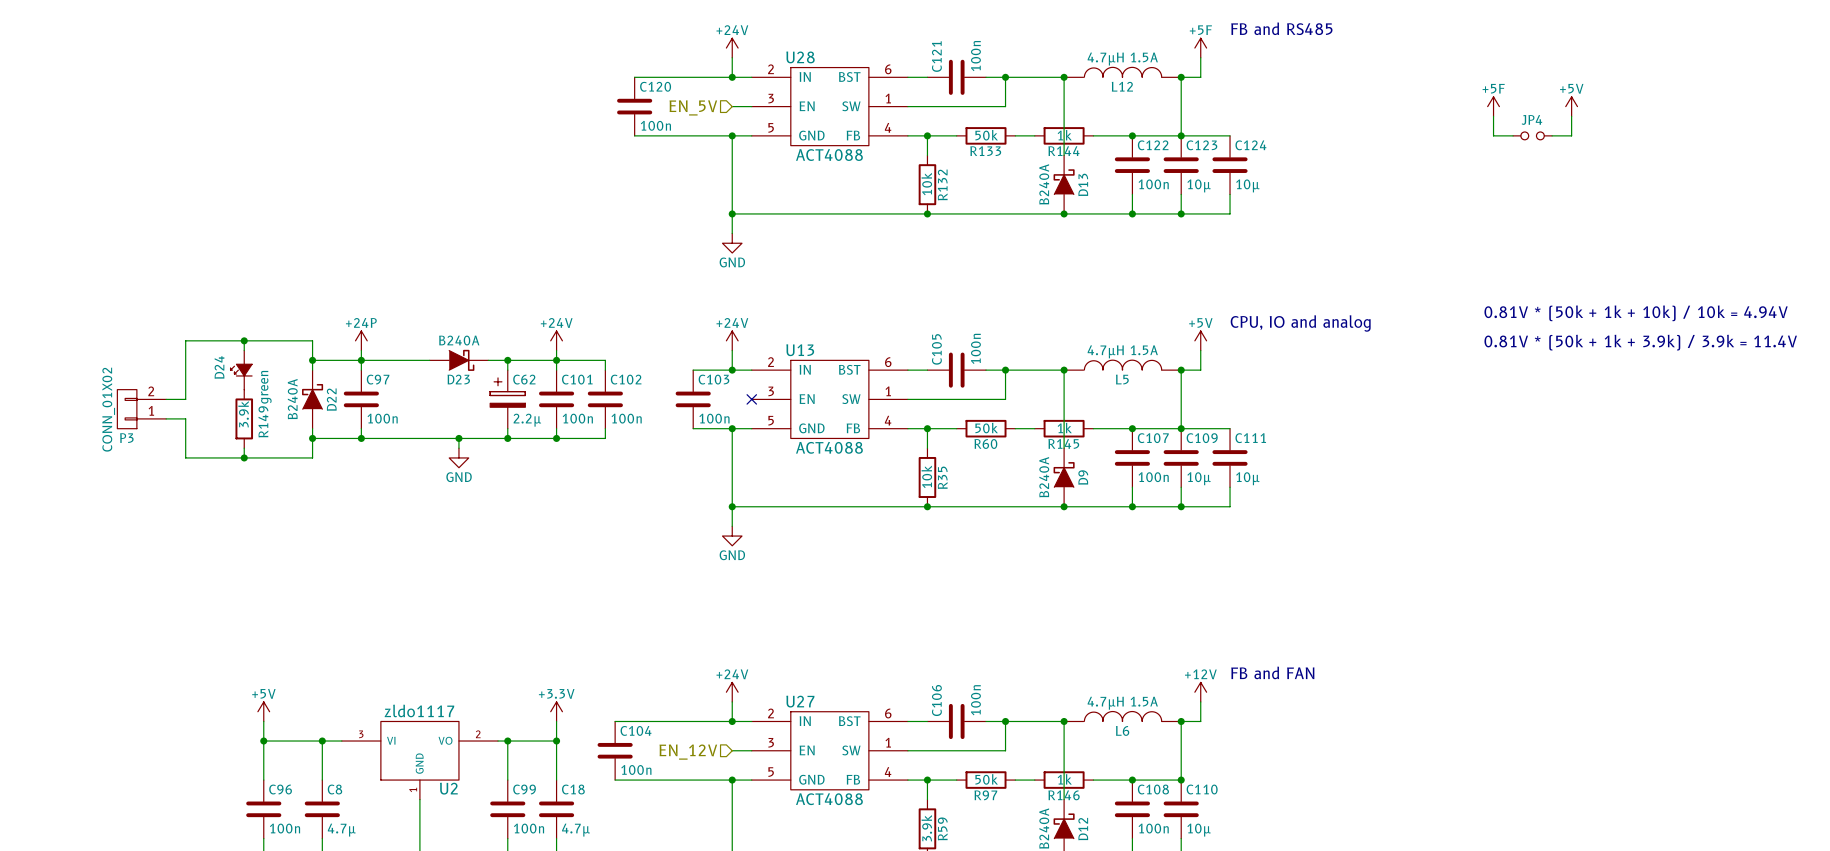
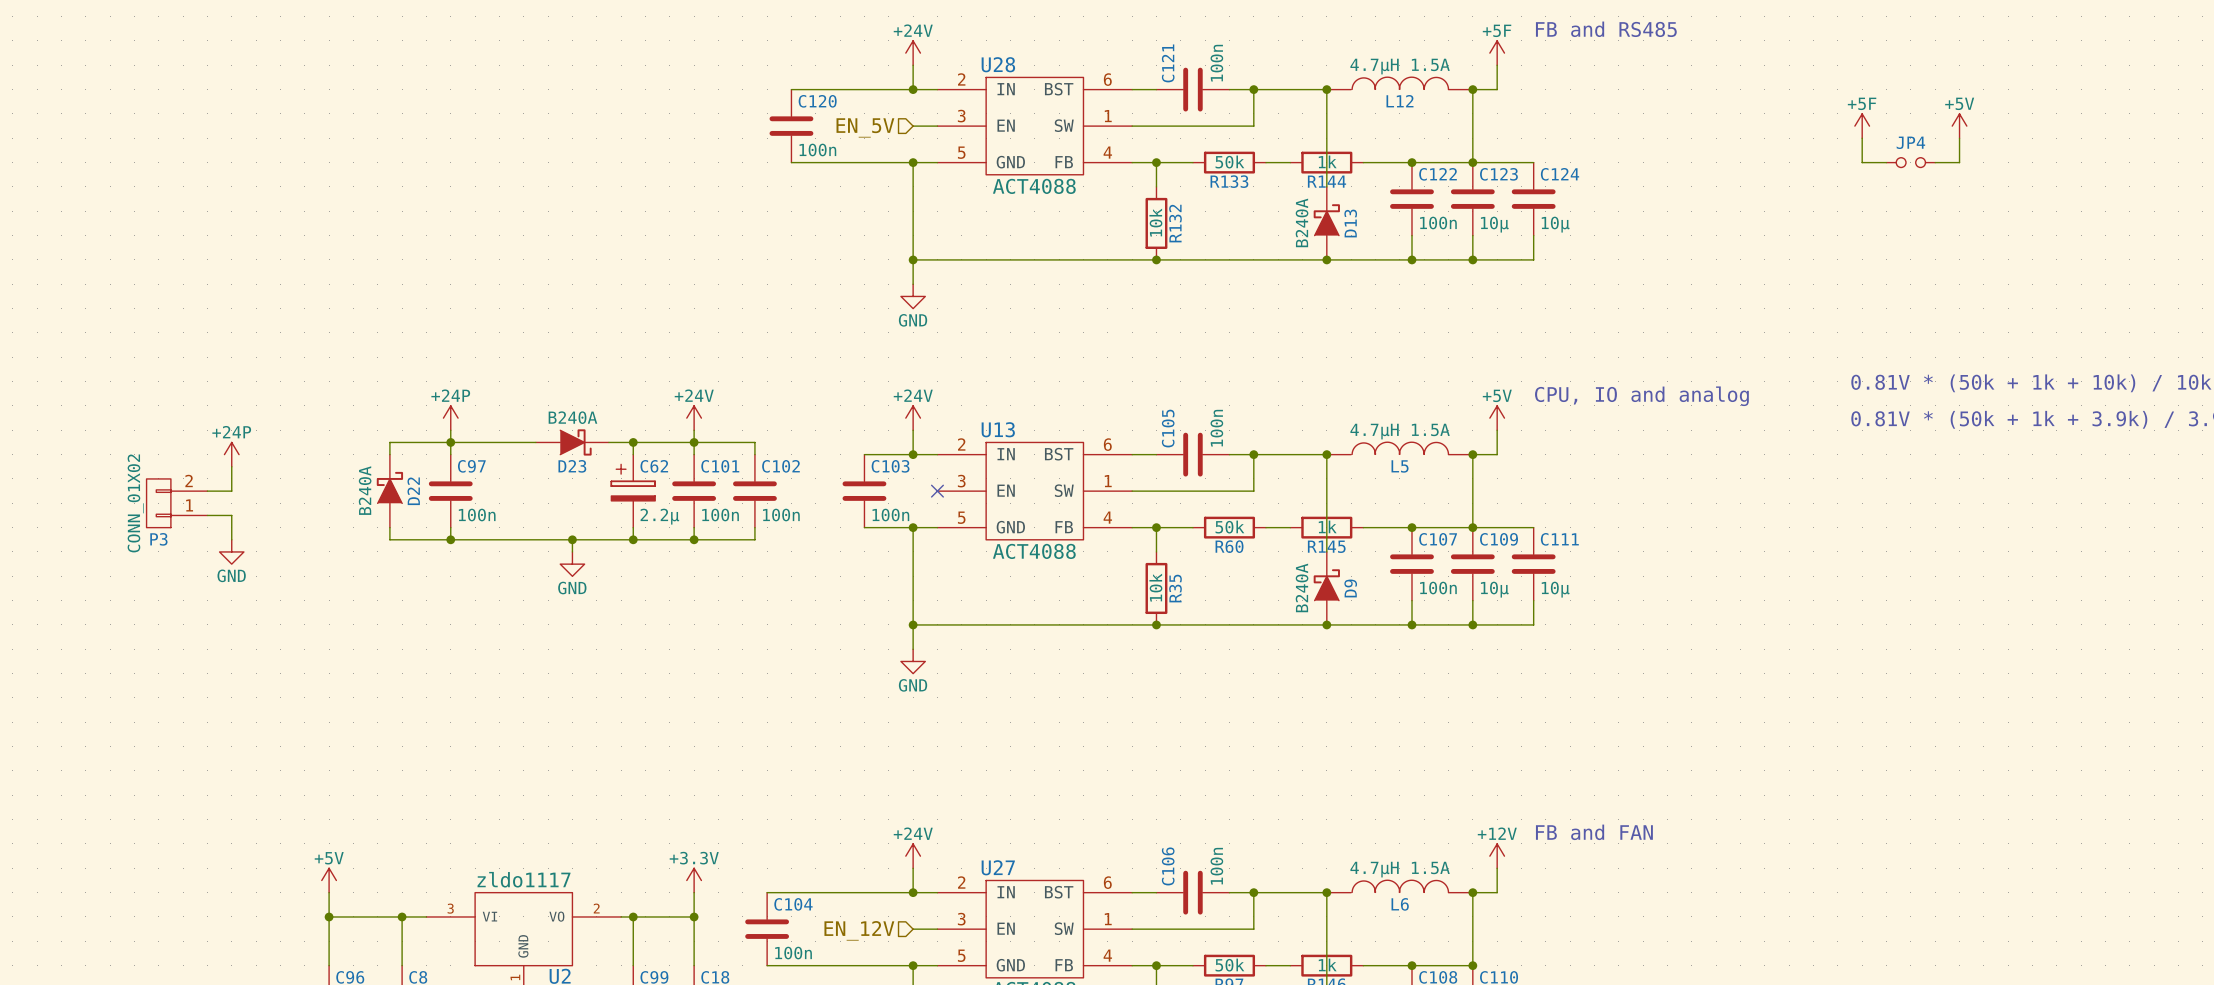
wire: (244, 340) (244, 350) -> none
junction: (244, 340) -> none
wire: (312, 360) (312, 340) (185, 340) (185, 379) -> none
junction: (312, 360) -> none
power symbol: none -> +24P (231, 454)
D24: green (241, 370) -> none
R149: 3.9k (244, 418) -> none
wire: (185, 438) (185, 457) (312, 457) (312, 438) -> none
junction: (312, 438) -> none
power symbol: none -> GND (231, 551)
wire: (244, 448) (244, 457) -> none
junction: (244, 457) -> none

